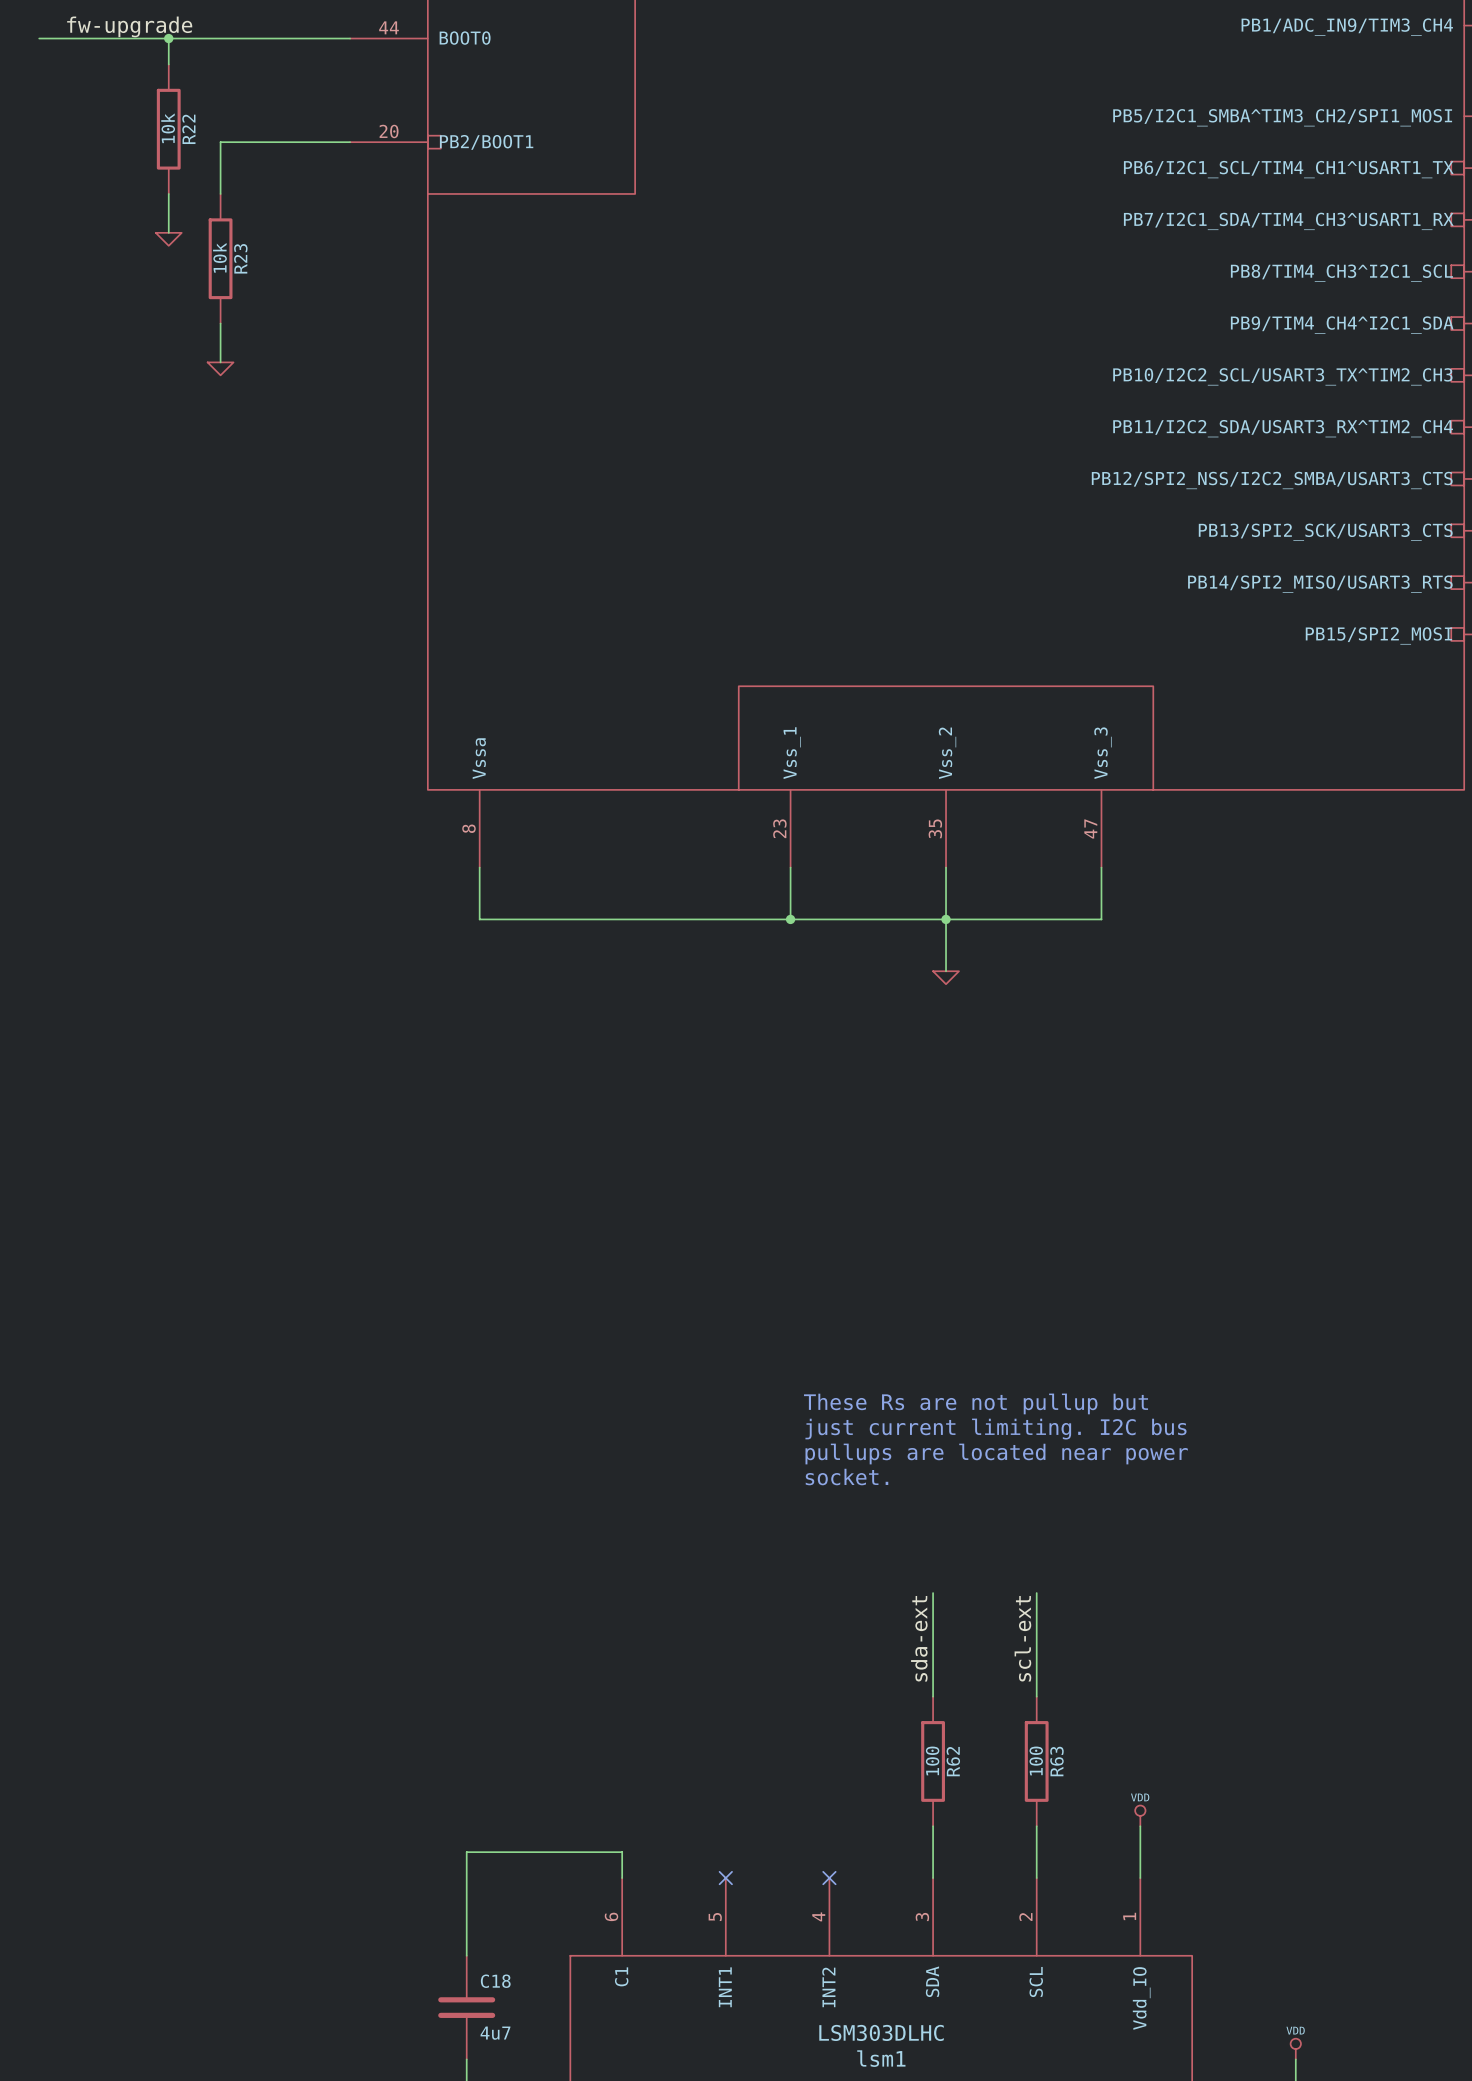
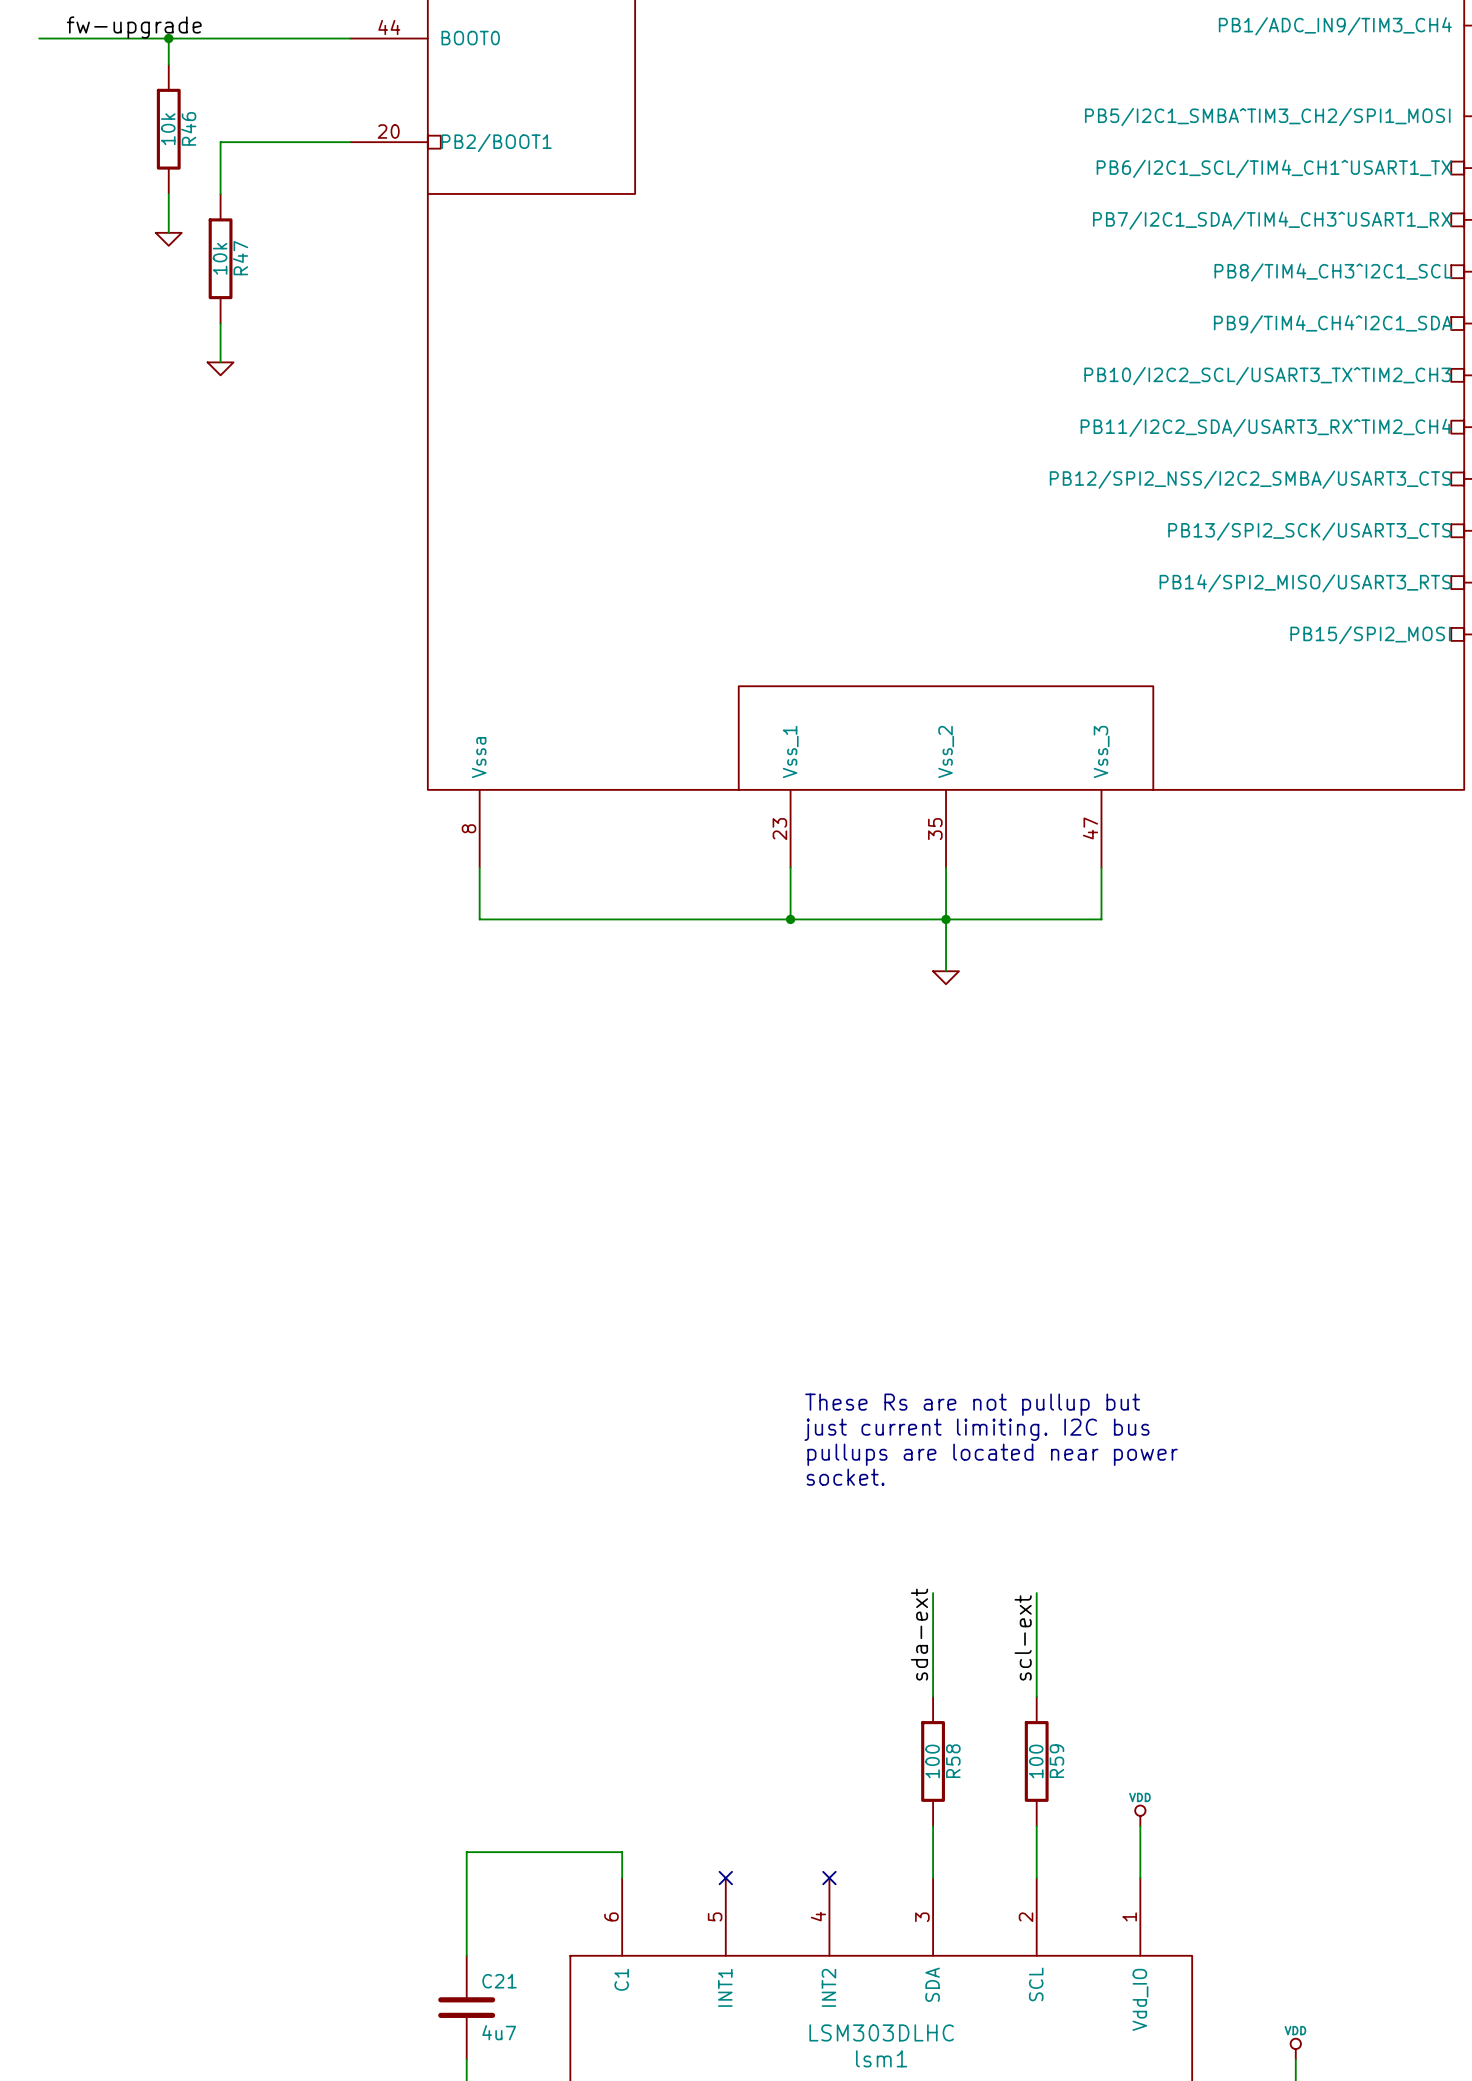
R22 name: R22 (188, 129) -> R46 (188, 128)
R23 name: R23 (240, 258) -> R47 (240, 258)
R62 name: R62 (953, 1761) -> R58 (953, 1761)
R63 name: R63 (1056, 1761) -> R59 (1056, 1761)
C18 name: C18 (495, 1981) -> C21 (499, 1981)

